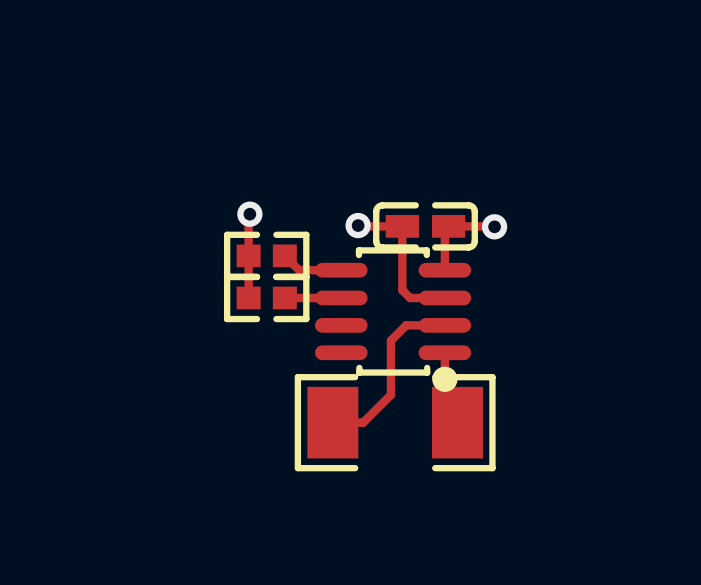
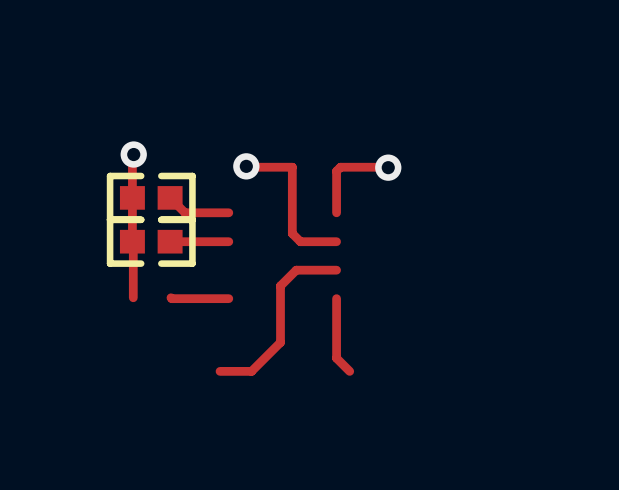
part: (425, 226) -> none
top track: none -> (132, 241) (133, 297)
part: (393, 319) -> none
top track: none -> (170, 297) (228, 298)
part: (395, 422) -> none

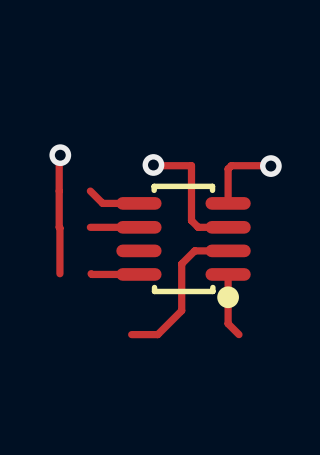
part: (151, 197) -> none
part: (151, 241) -> none
part: none -> (183, 245)

